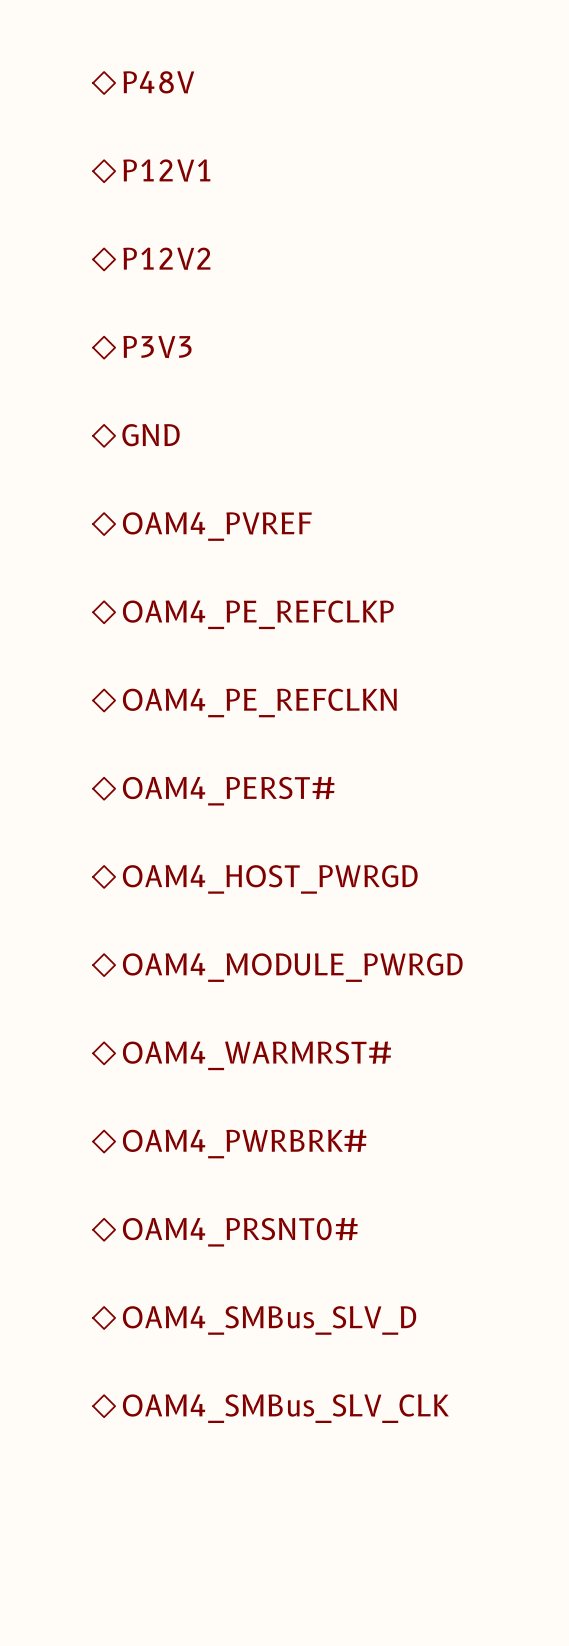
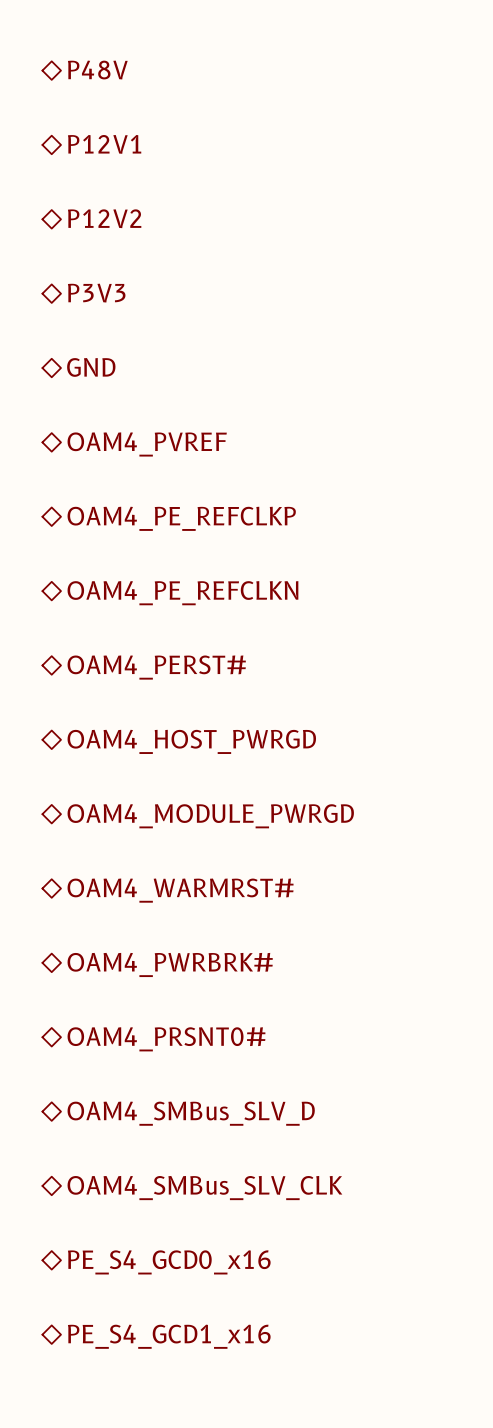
hierarchical label: none -> PE_S4_GCD0_x16 (169, 1262)
hierarchical label: none -> PE_S4_GCD1_x16 (169, 1336)

